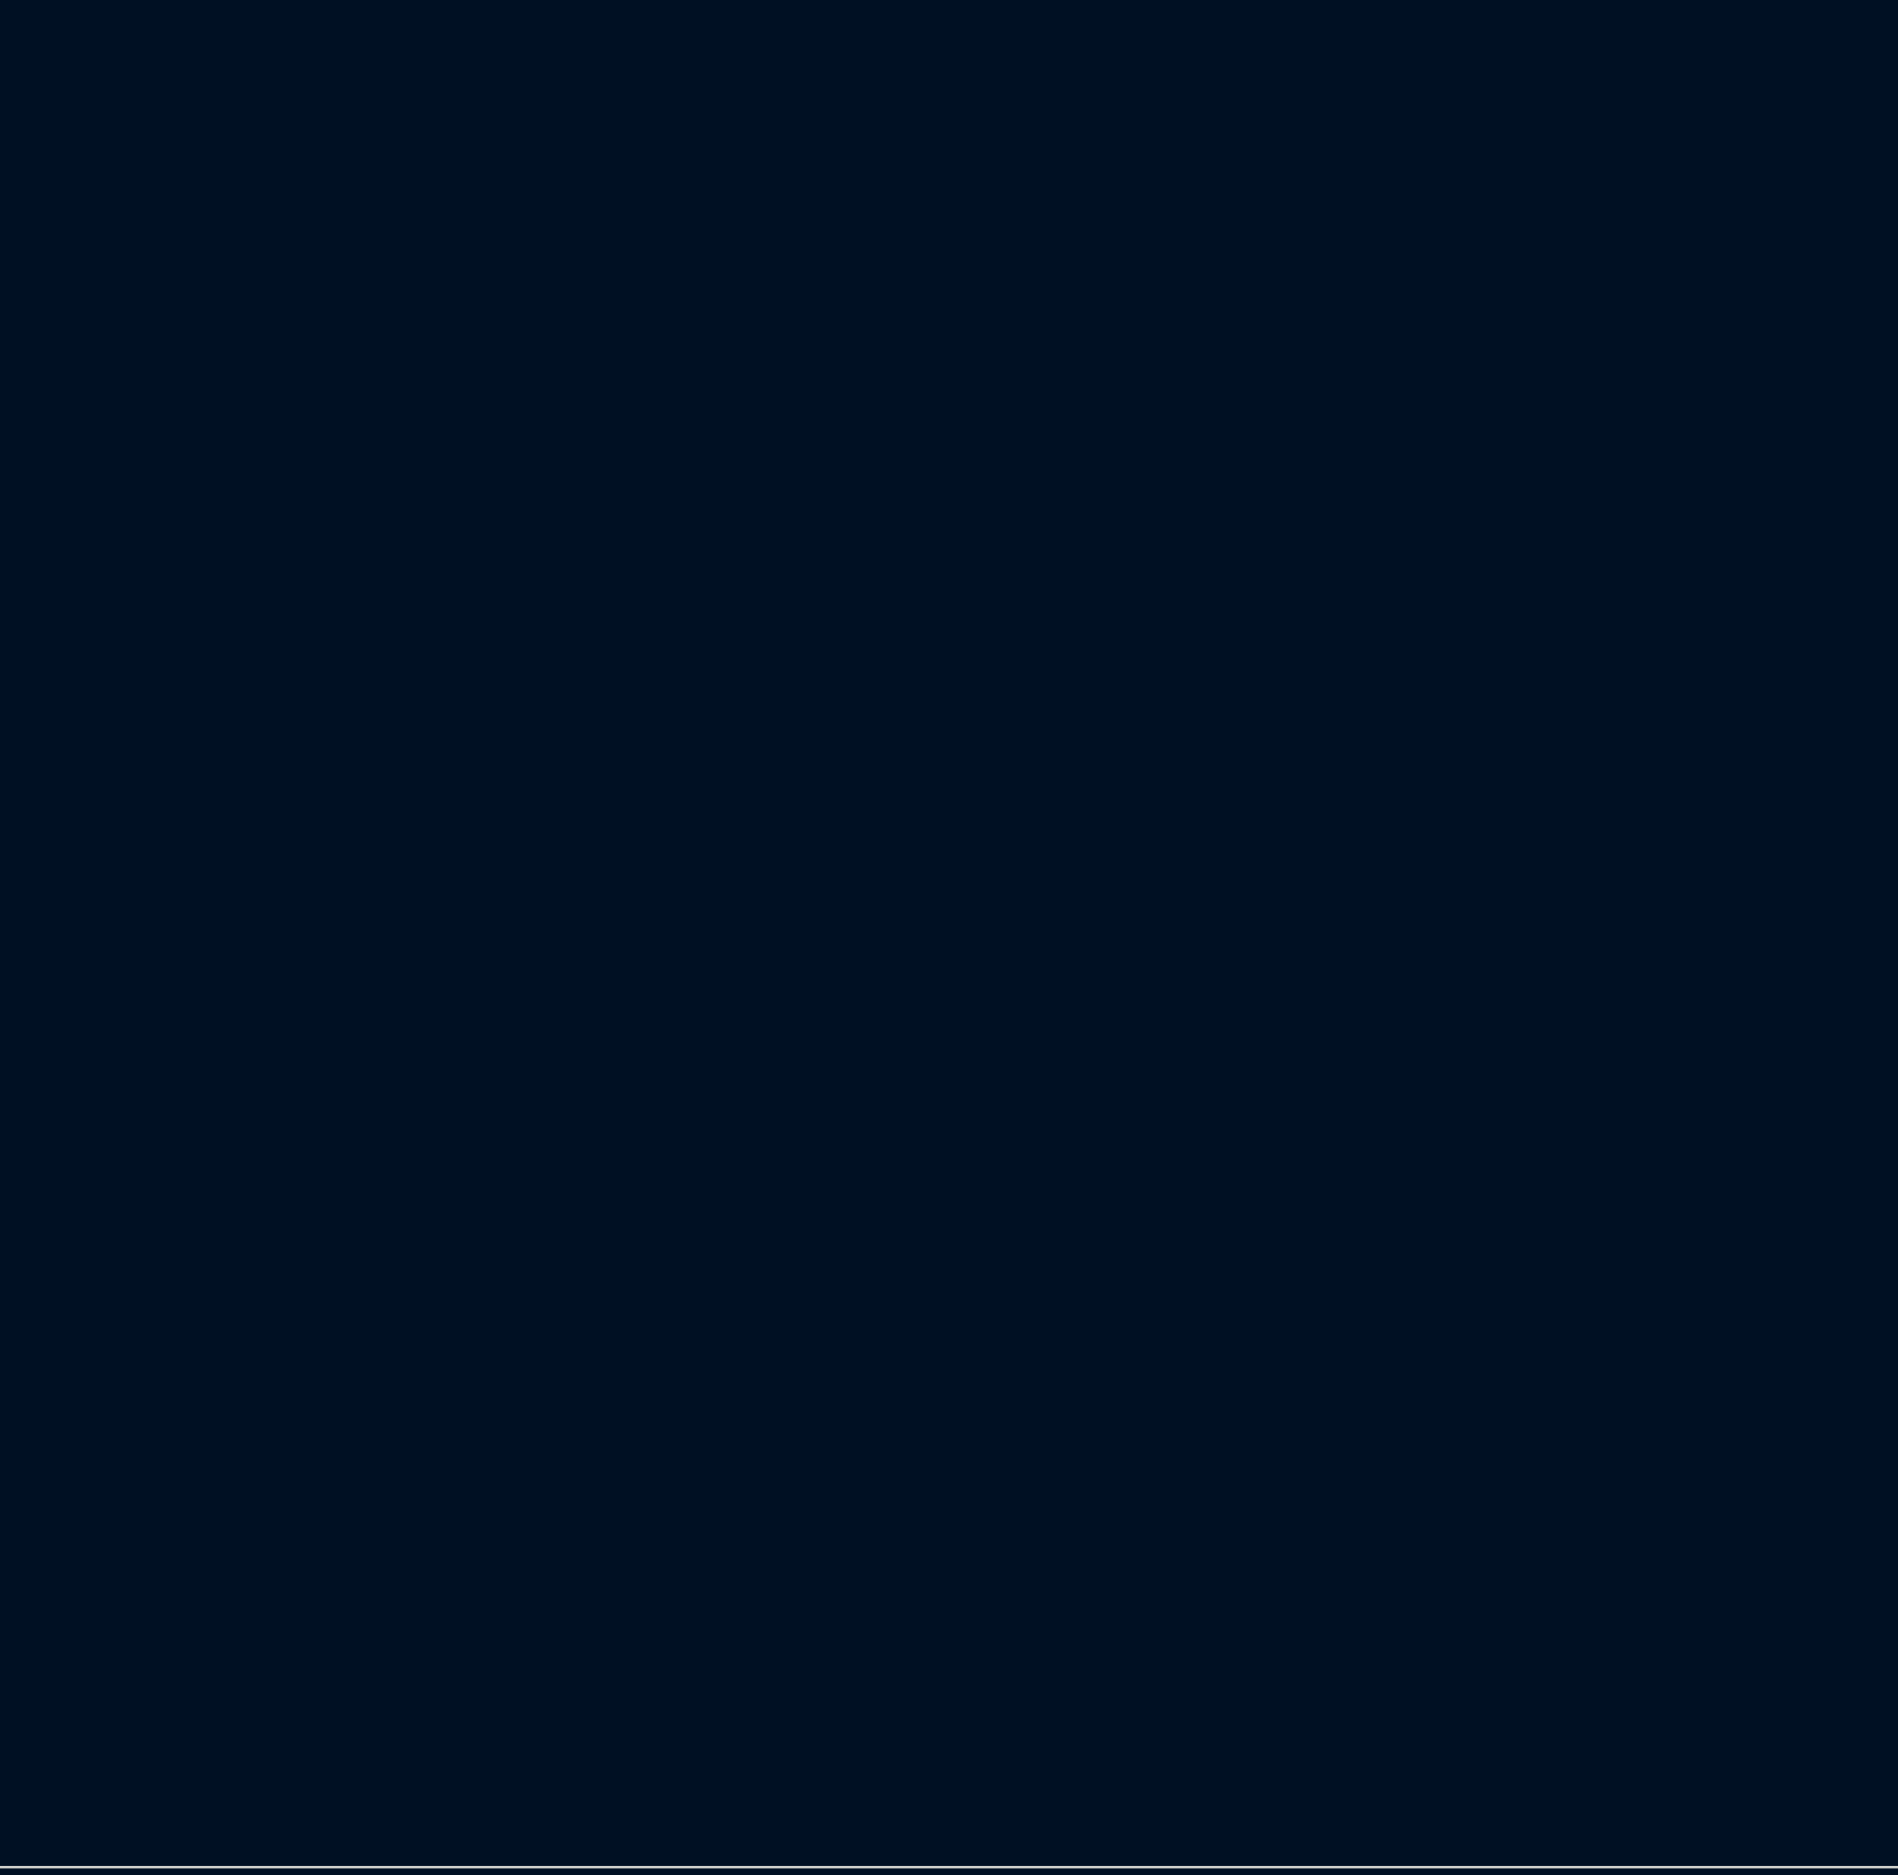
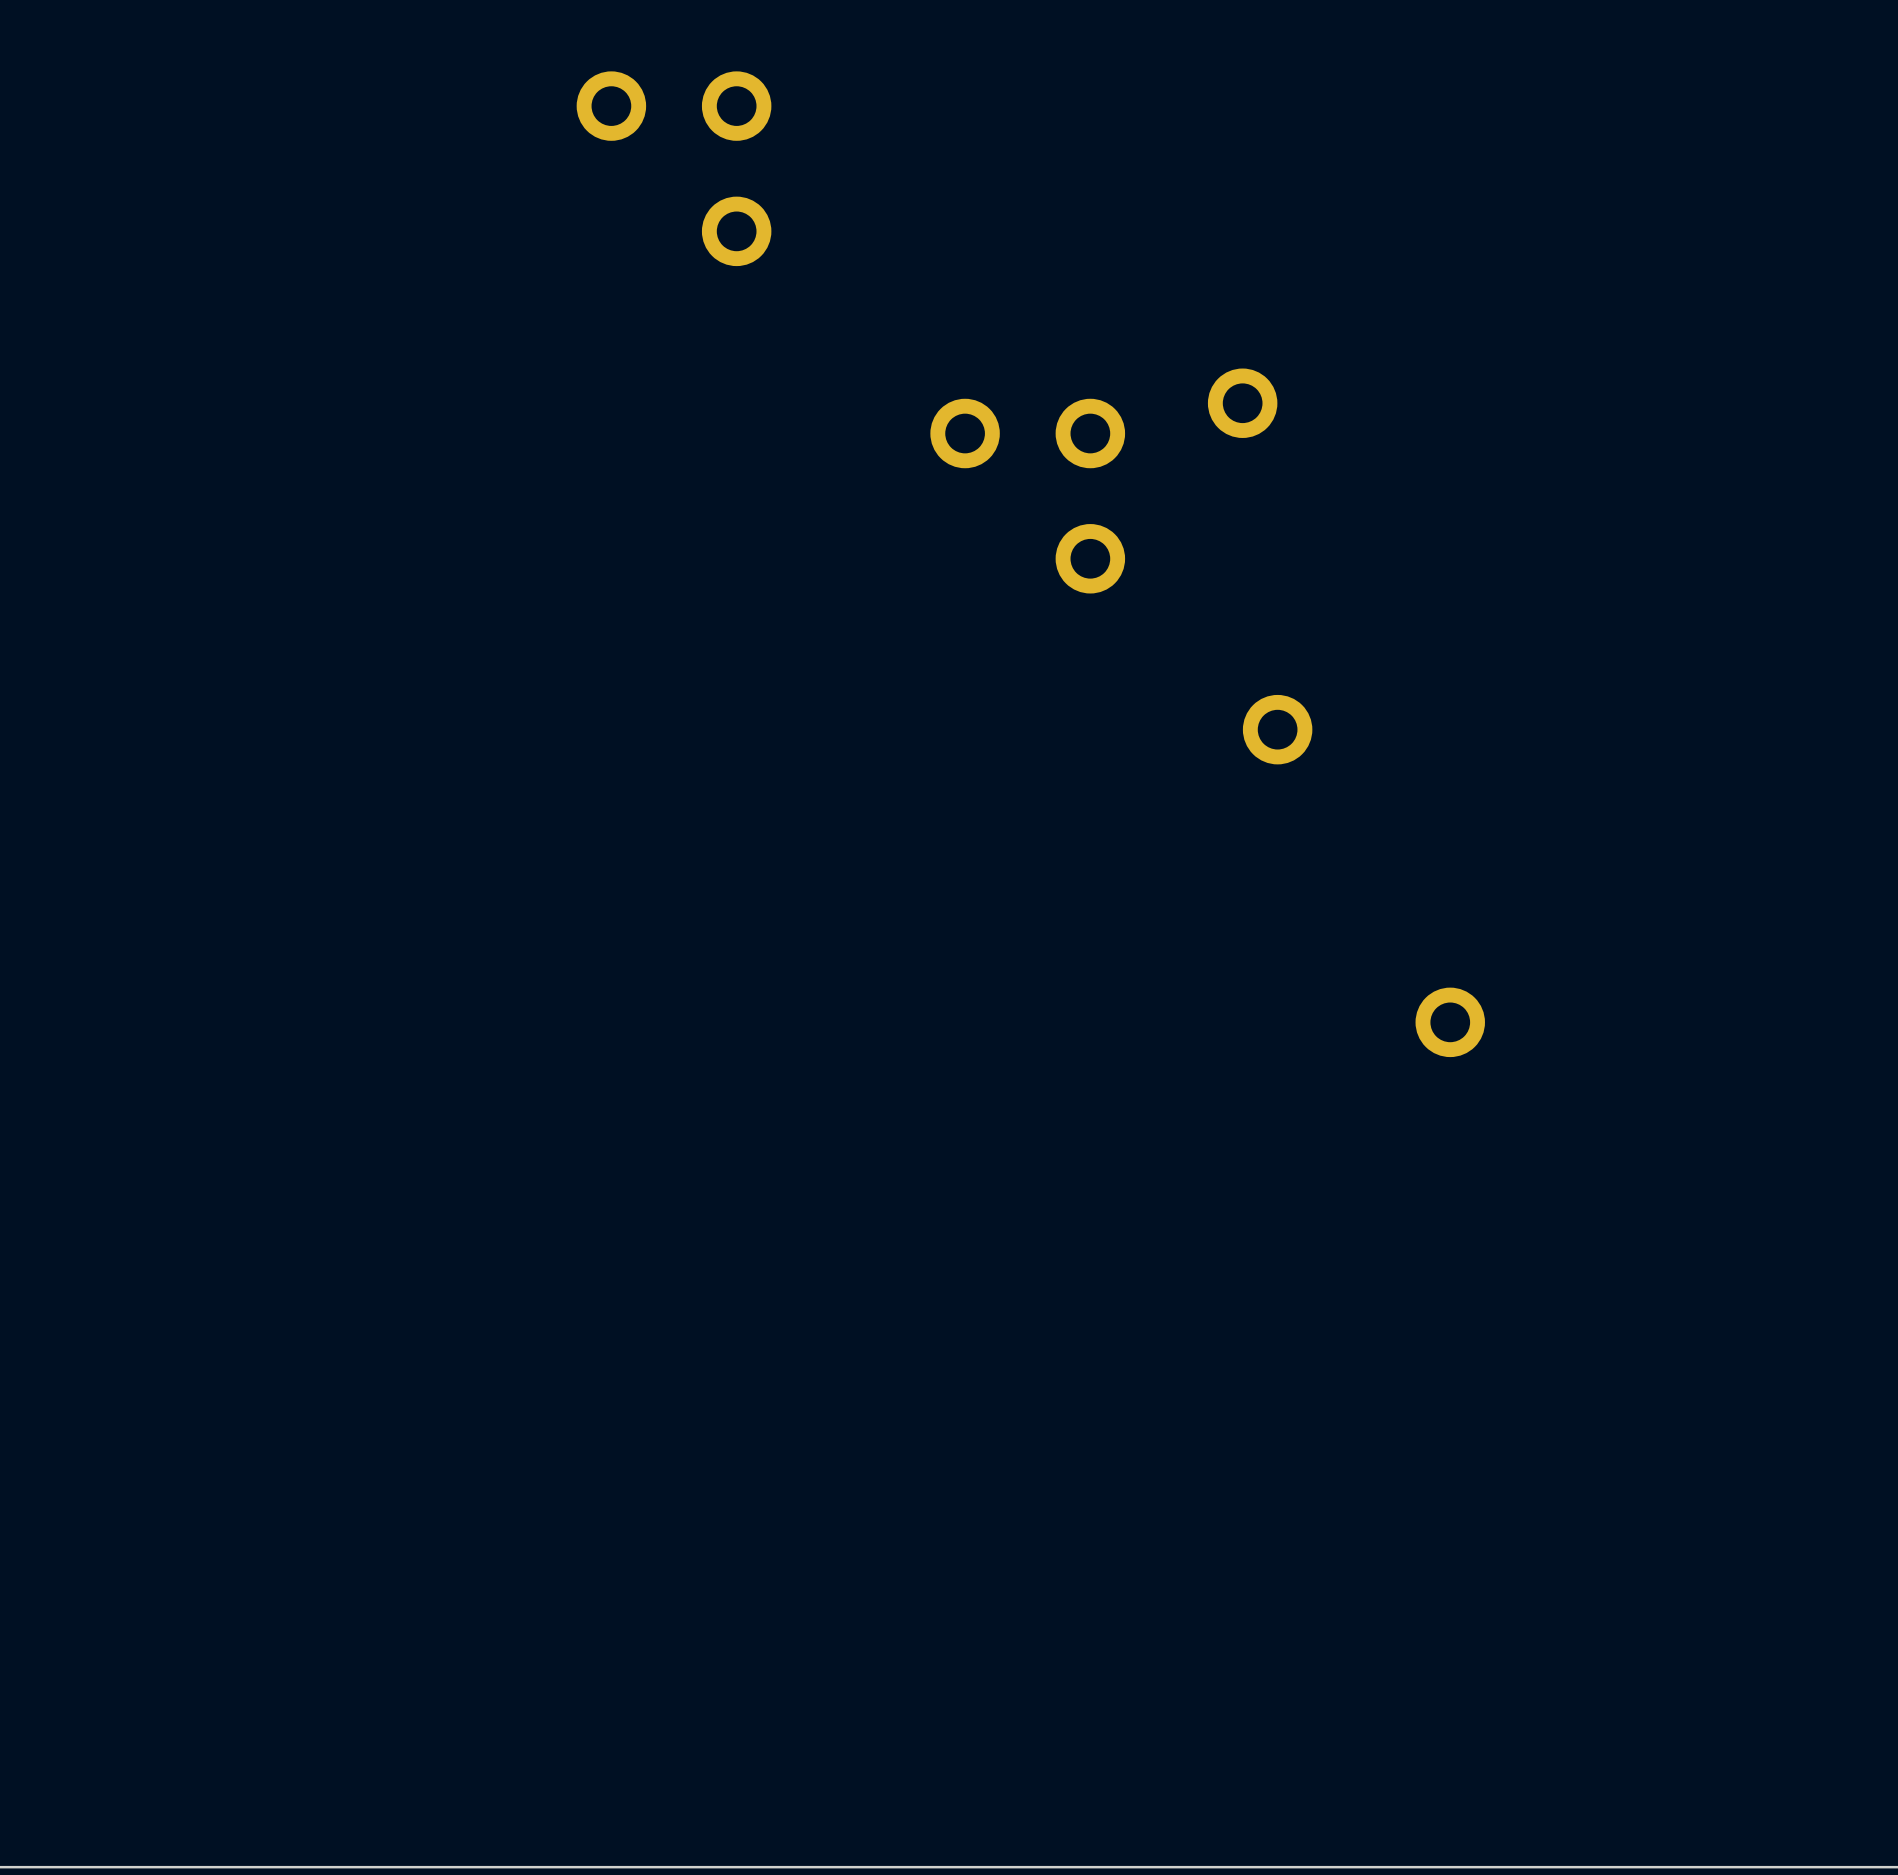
part: none -> (611, 106)
part: none -> (736, 106)
part: none -> (736, 231)
part: none -> (1242, 403)
part: none -> (965, 433)
part: none -> (1090, 433)
part: none -> (1090, 558)
part: none -> (1277, 729)
part: none -> (1450, 1022)

